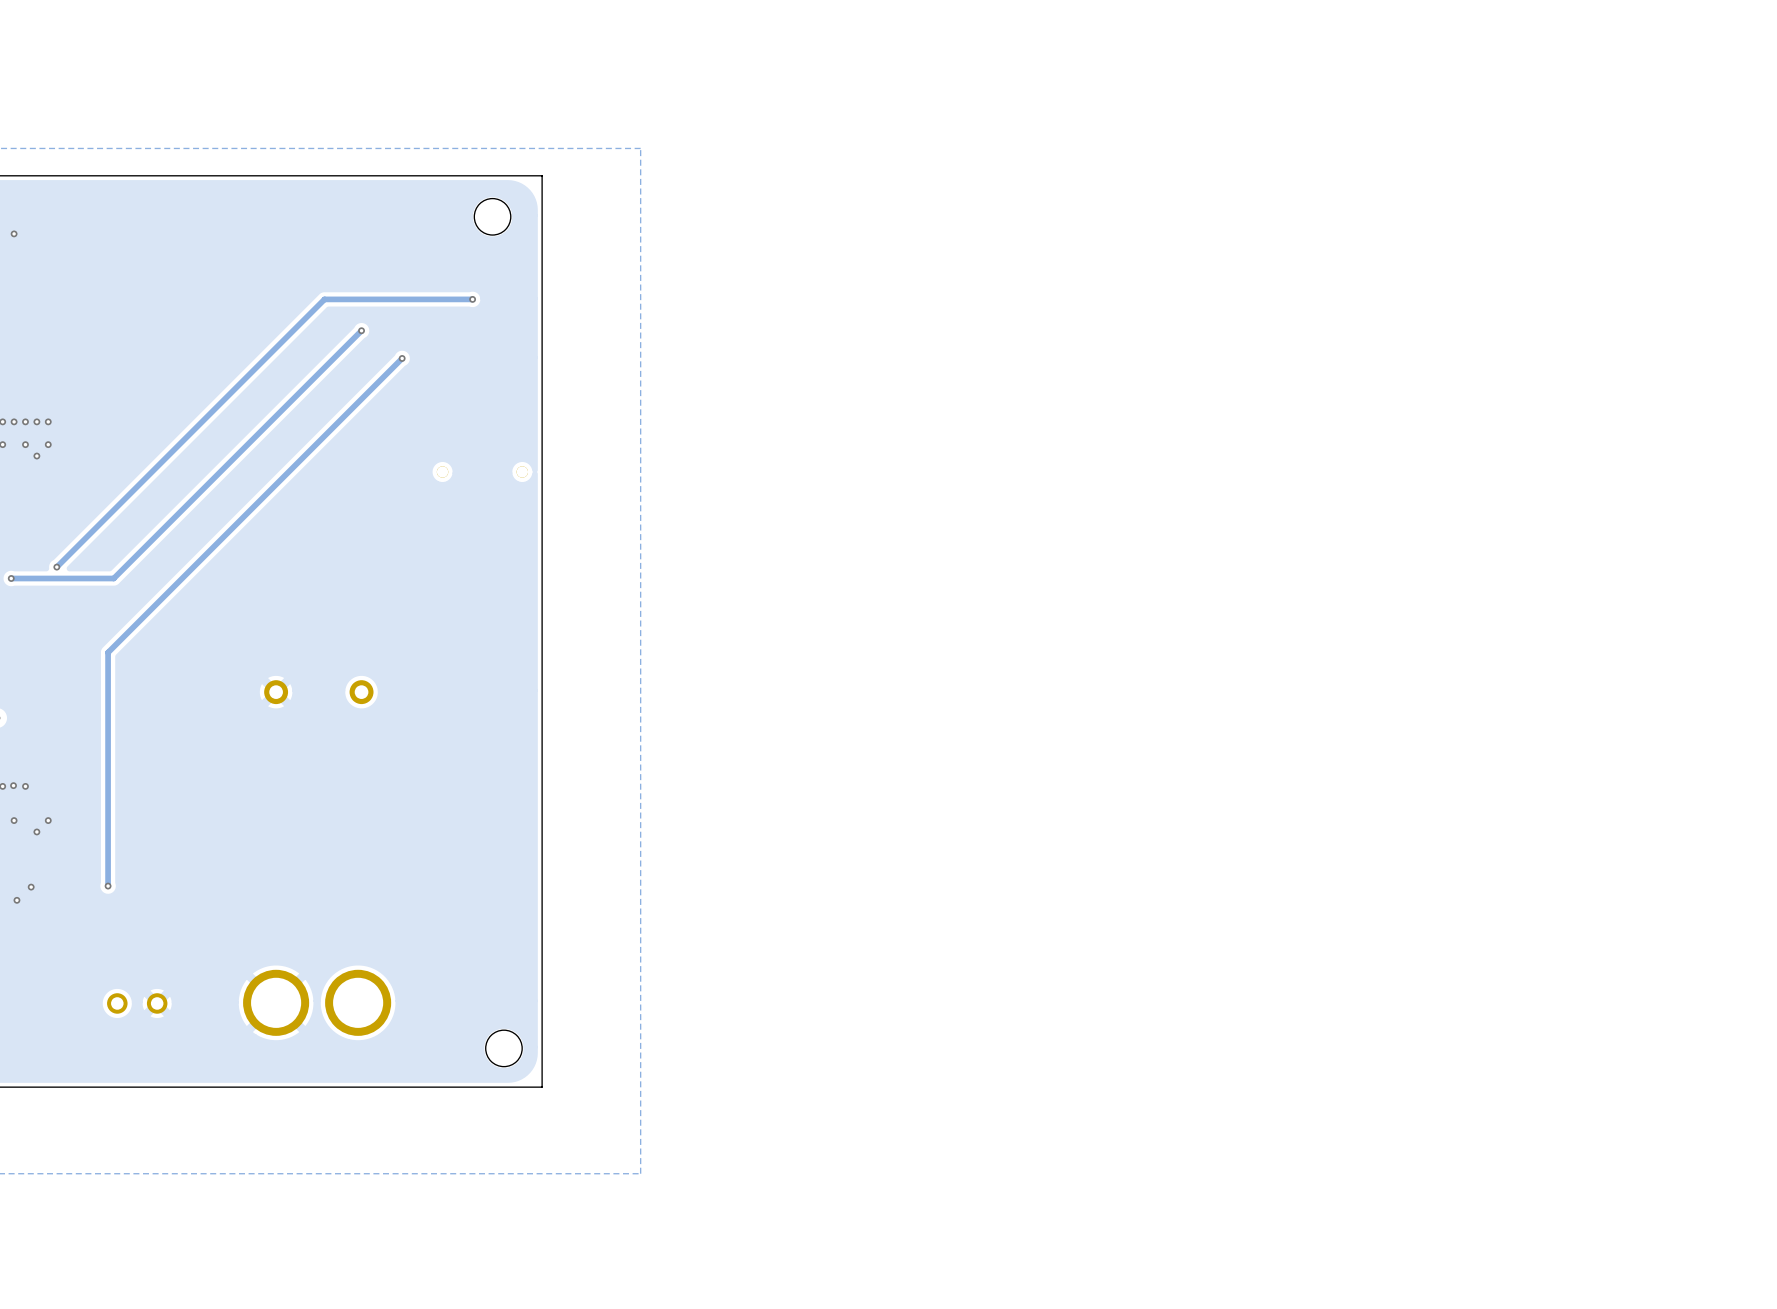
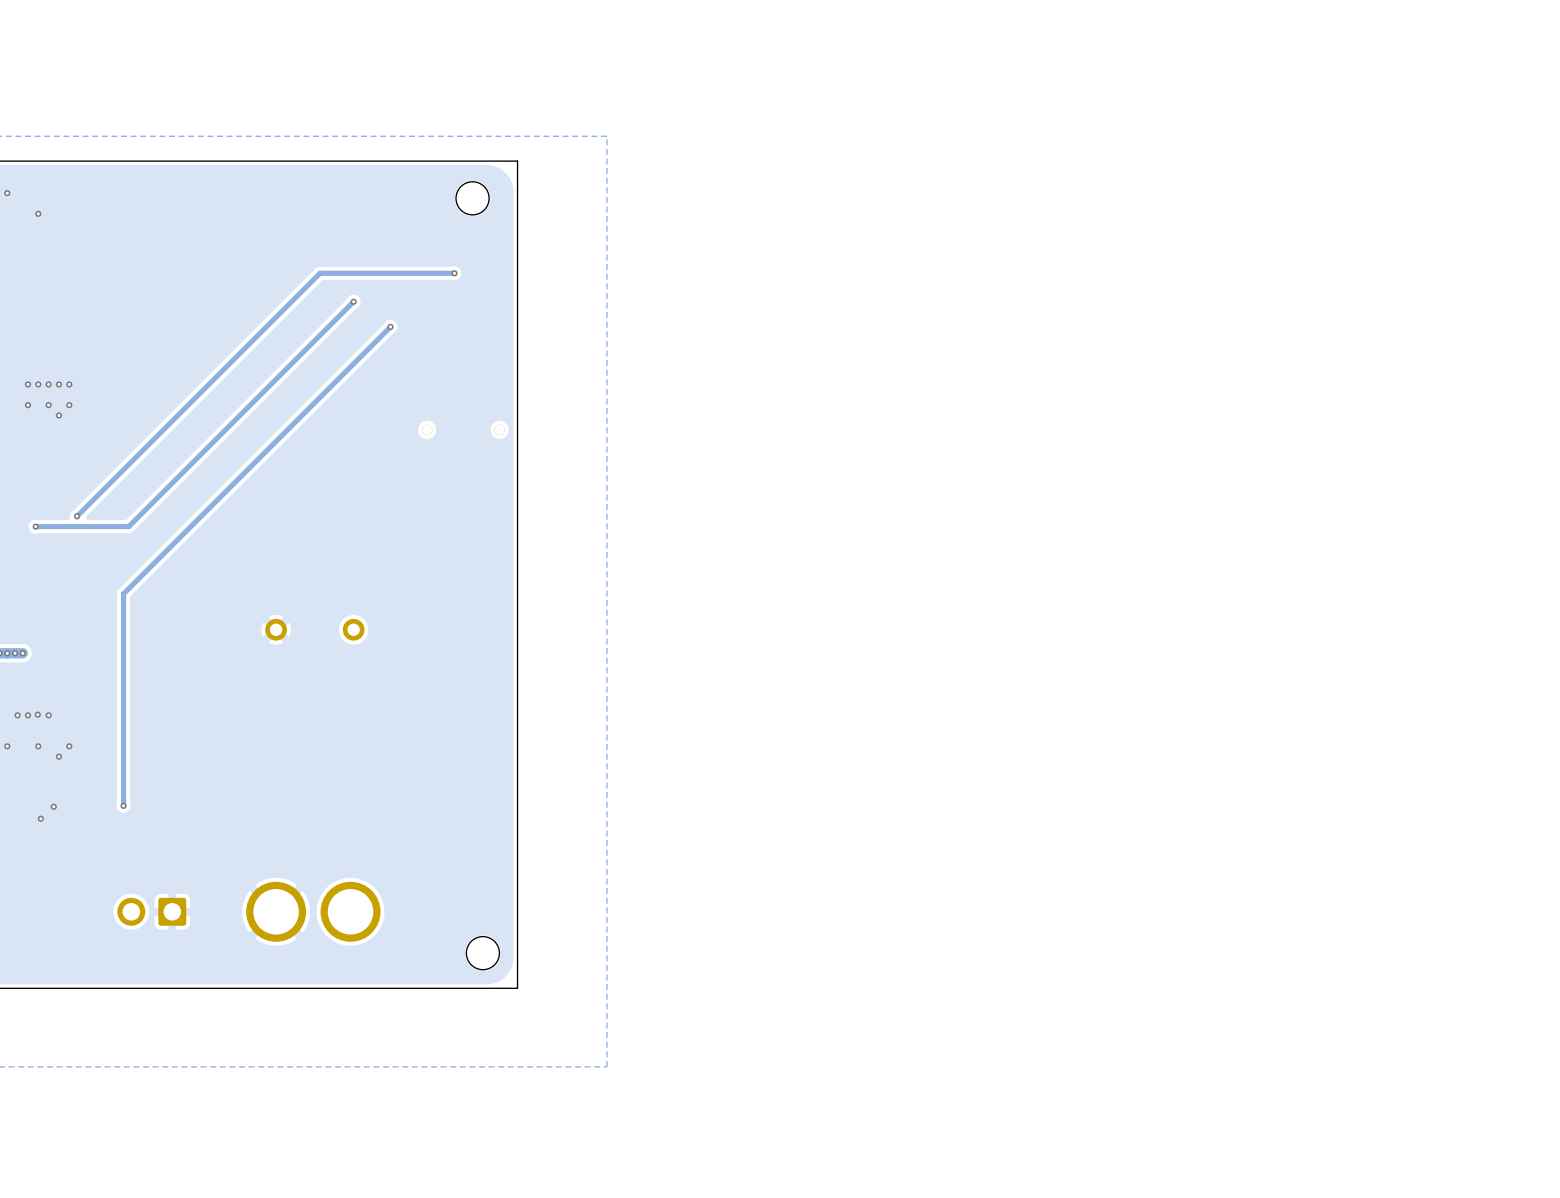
part footprint: [107, 993, 168, 1014] -> [117, 897, 187, 926]

